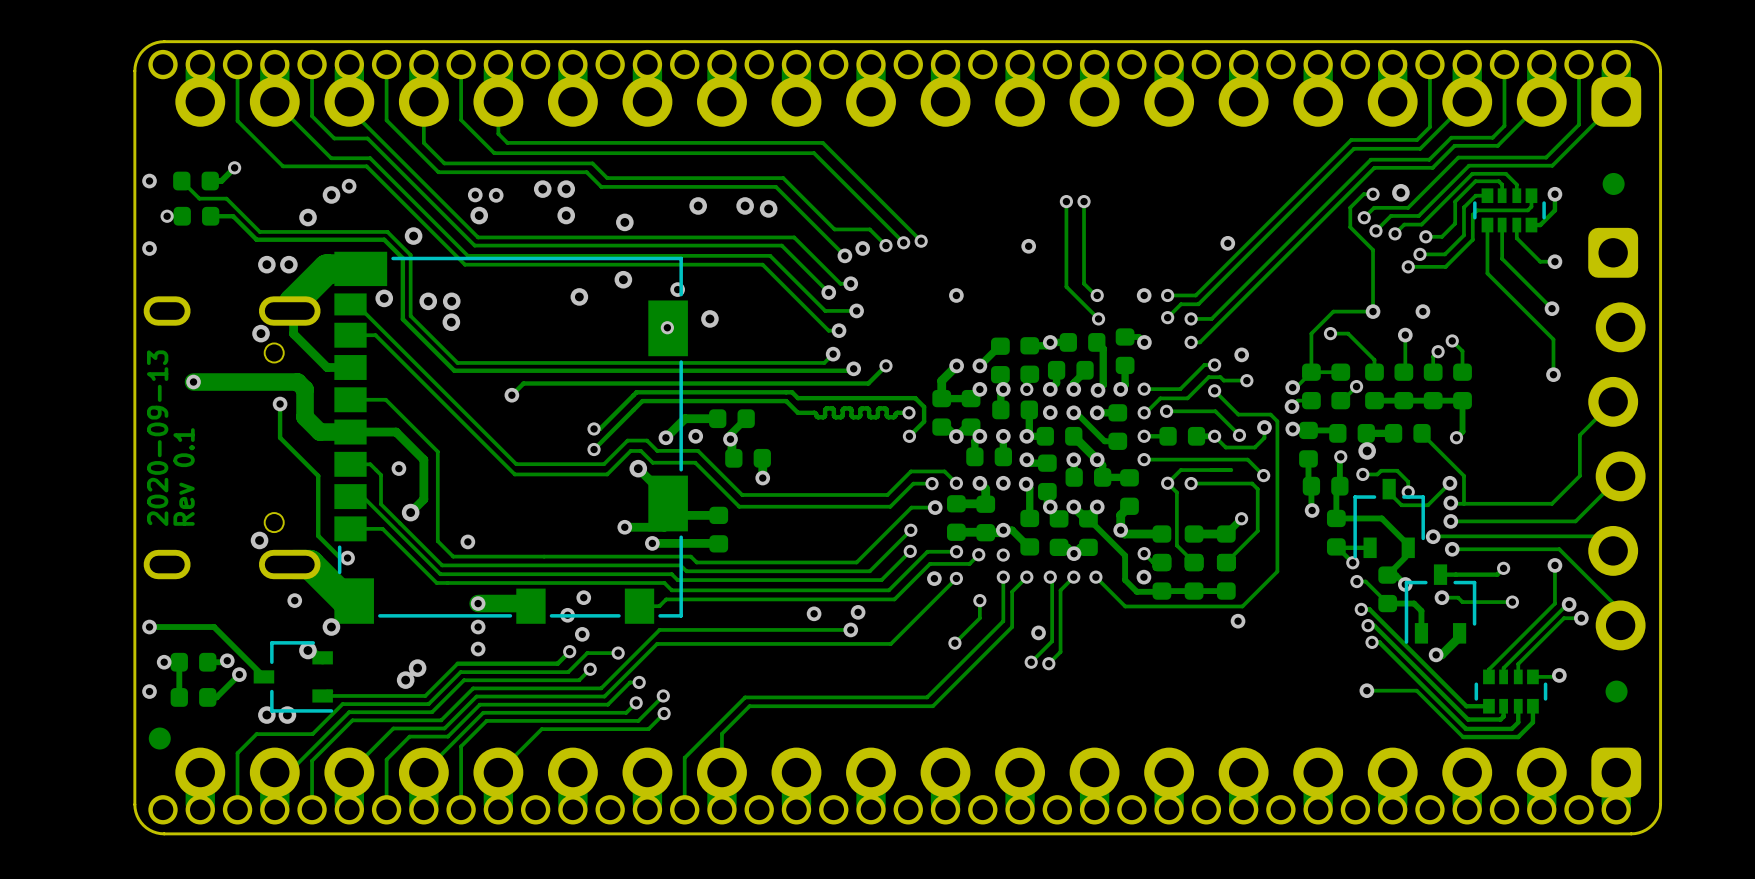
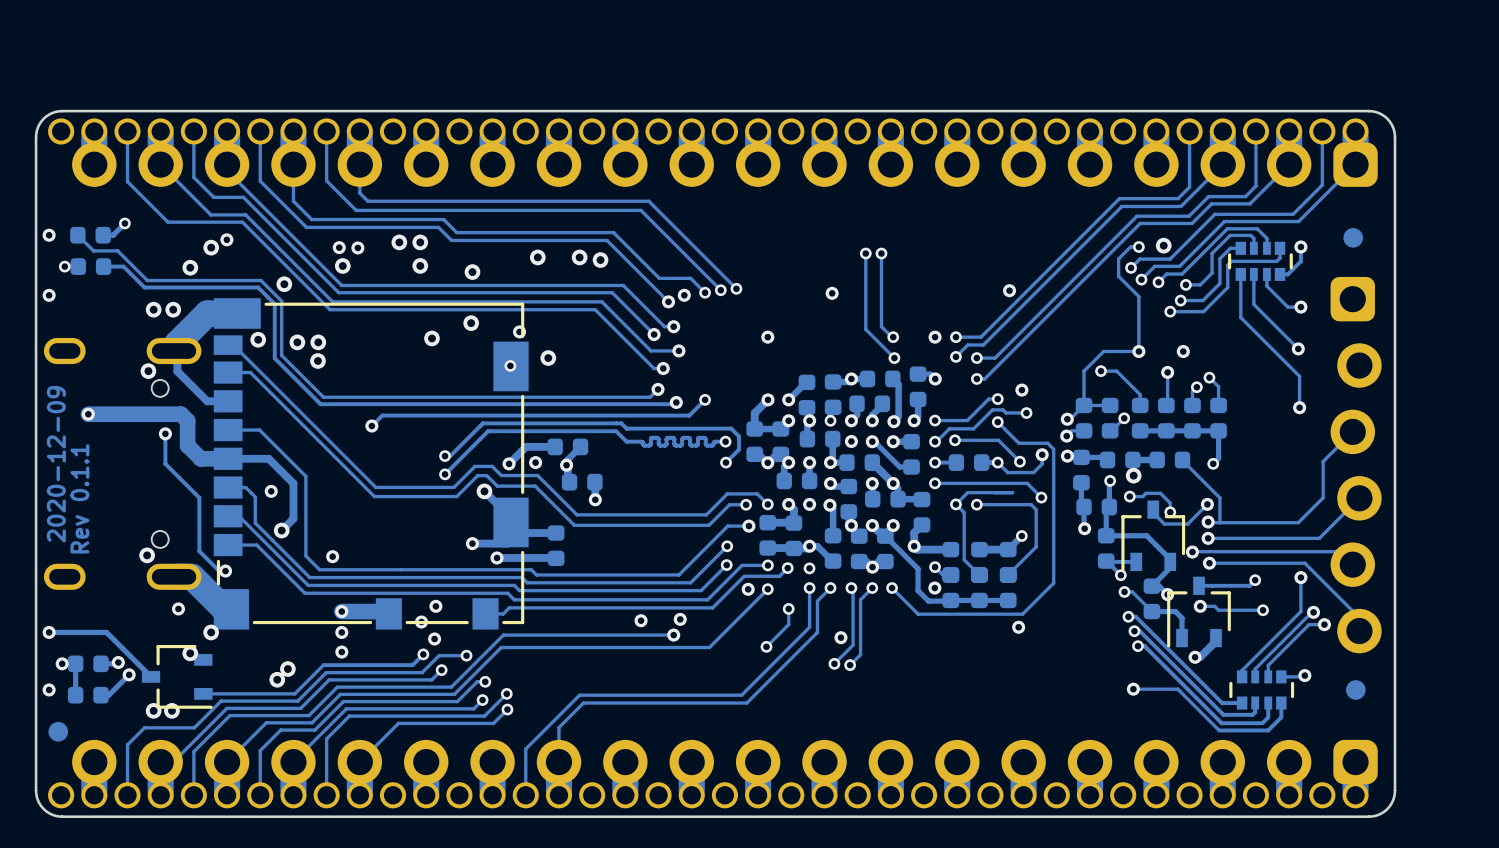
text: 2020-09-13 (157, 438) -> 2020-12-09 (56, 464)
text: Rev 0.1 (184, 476) -> Rev 0.1.1 (79, 498)

